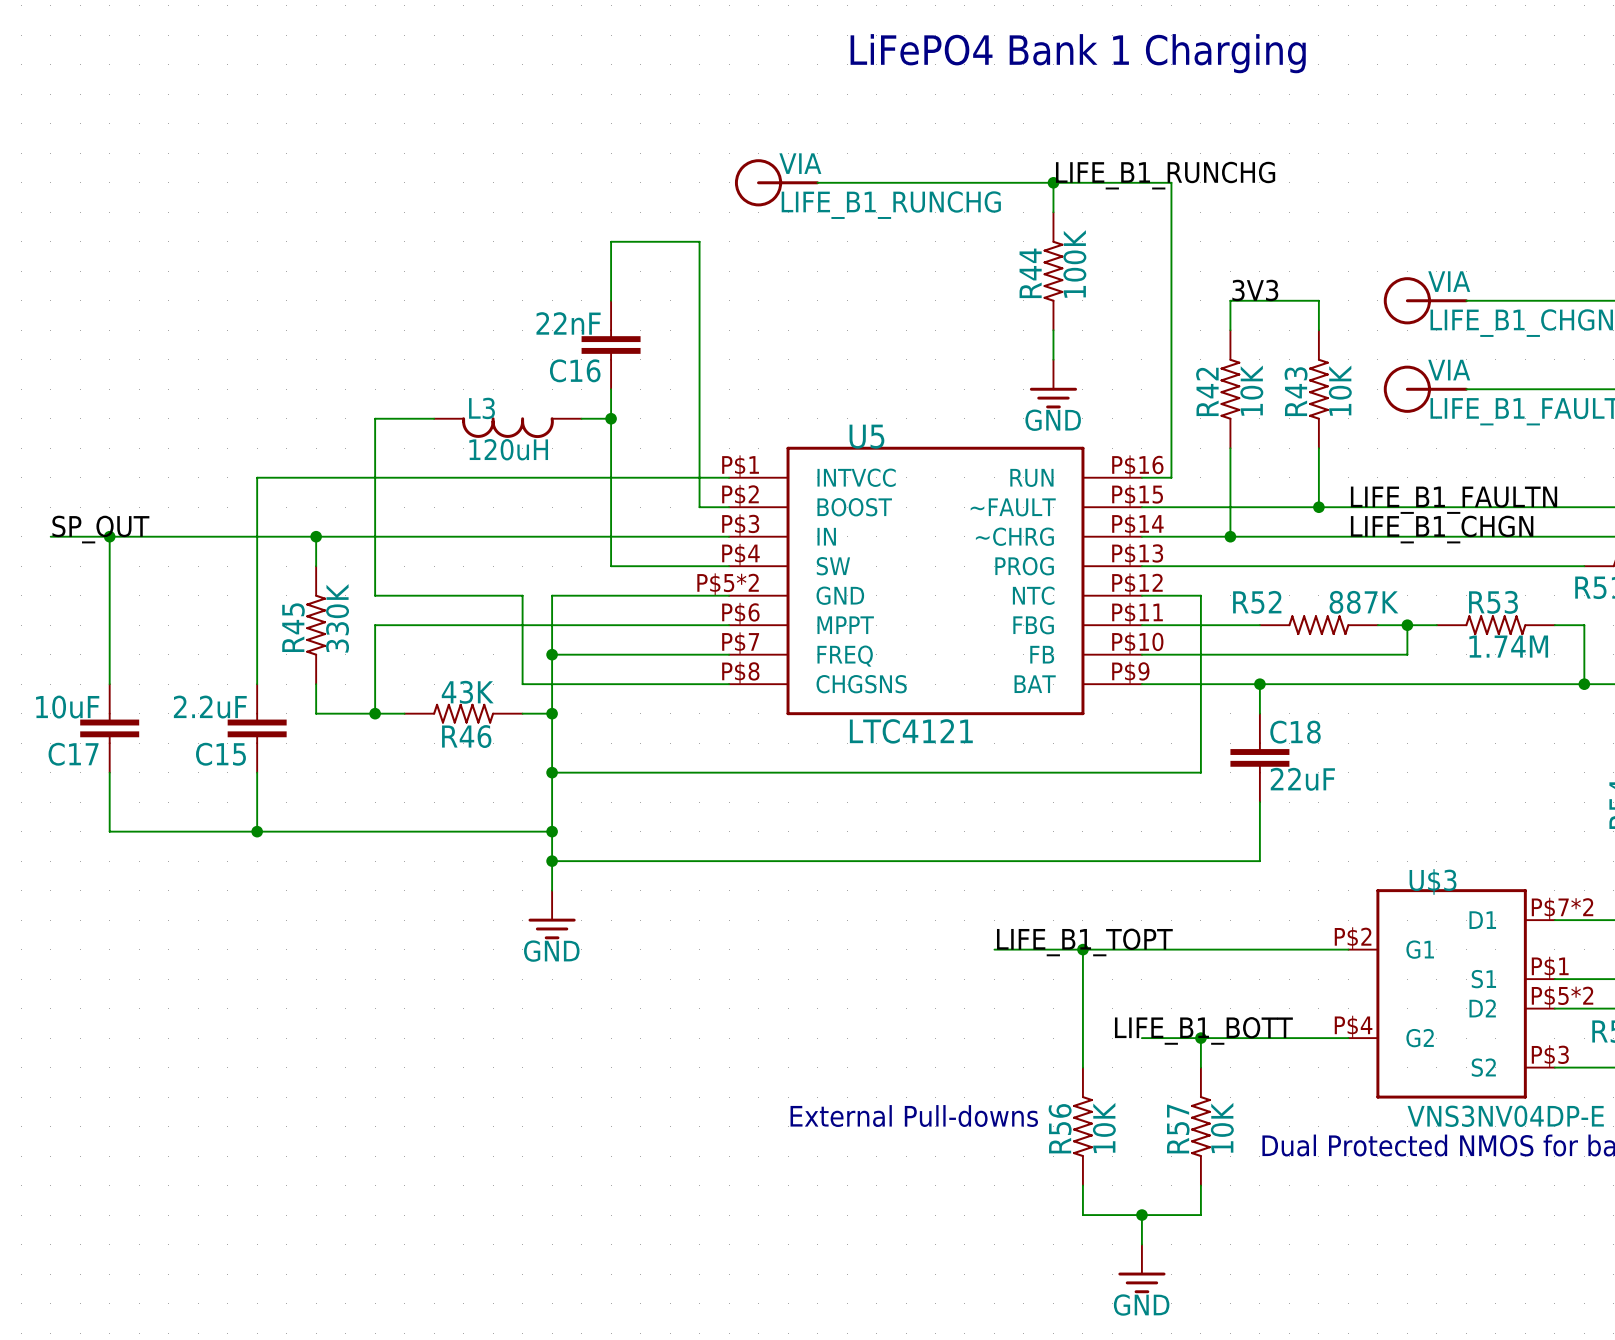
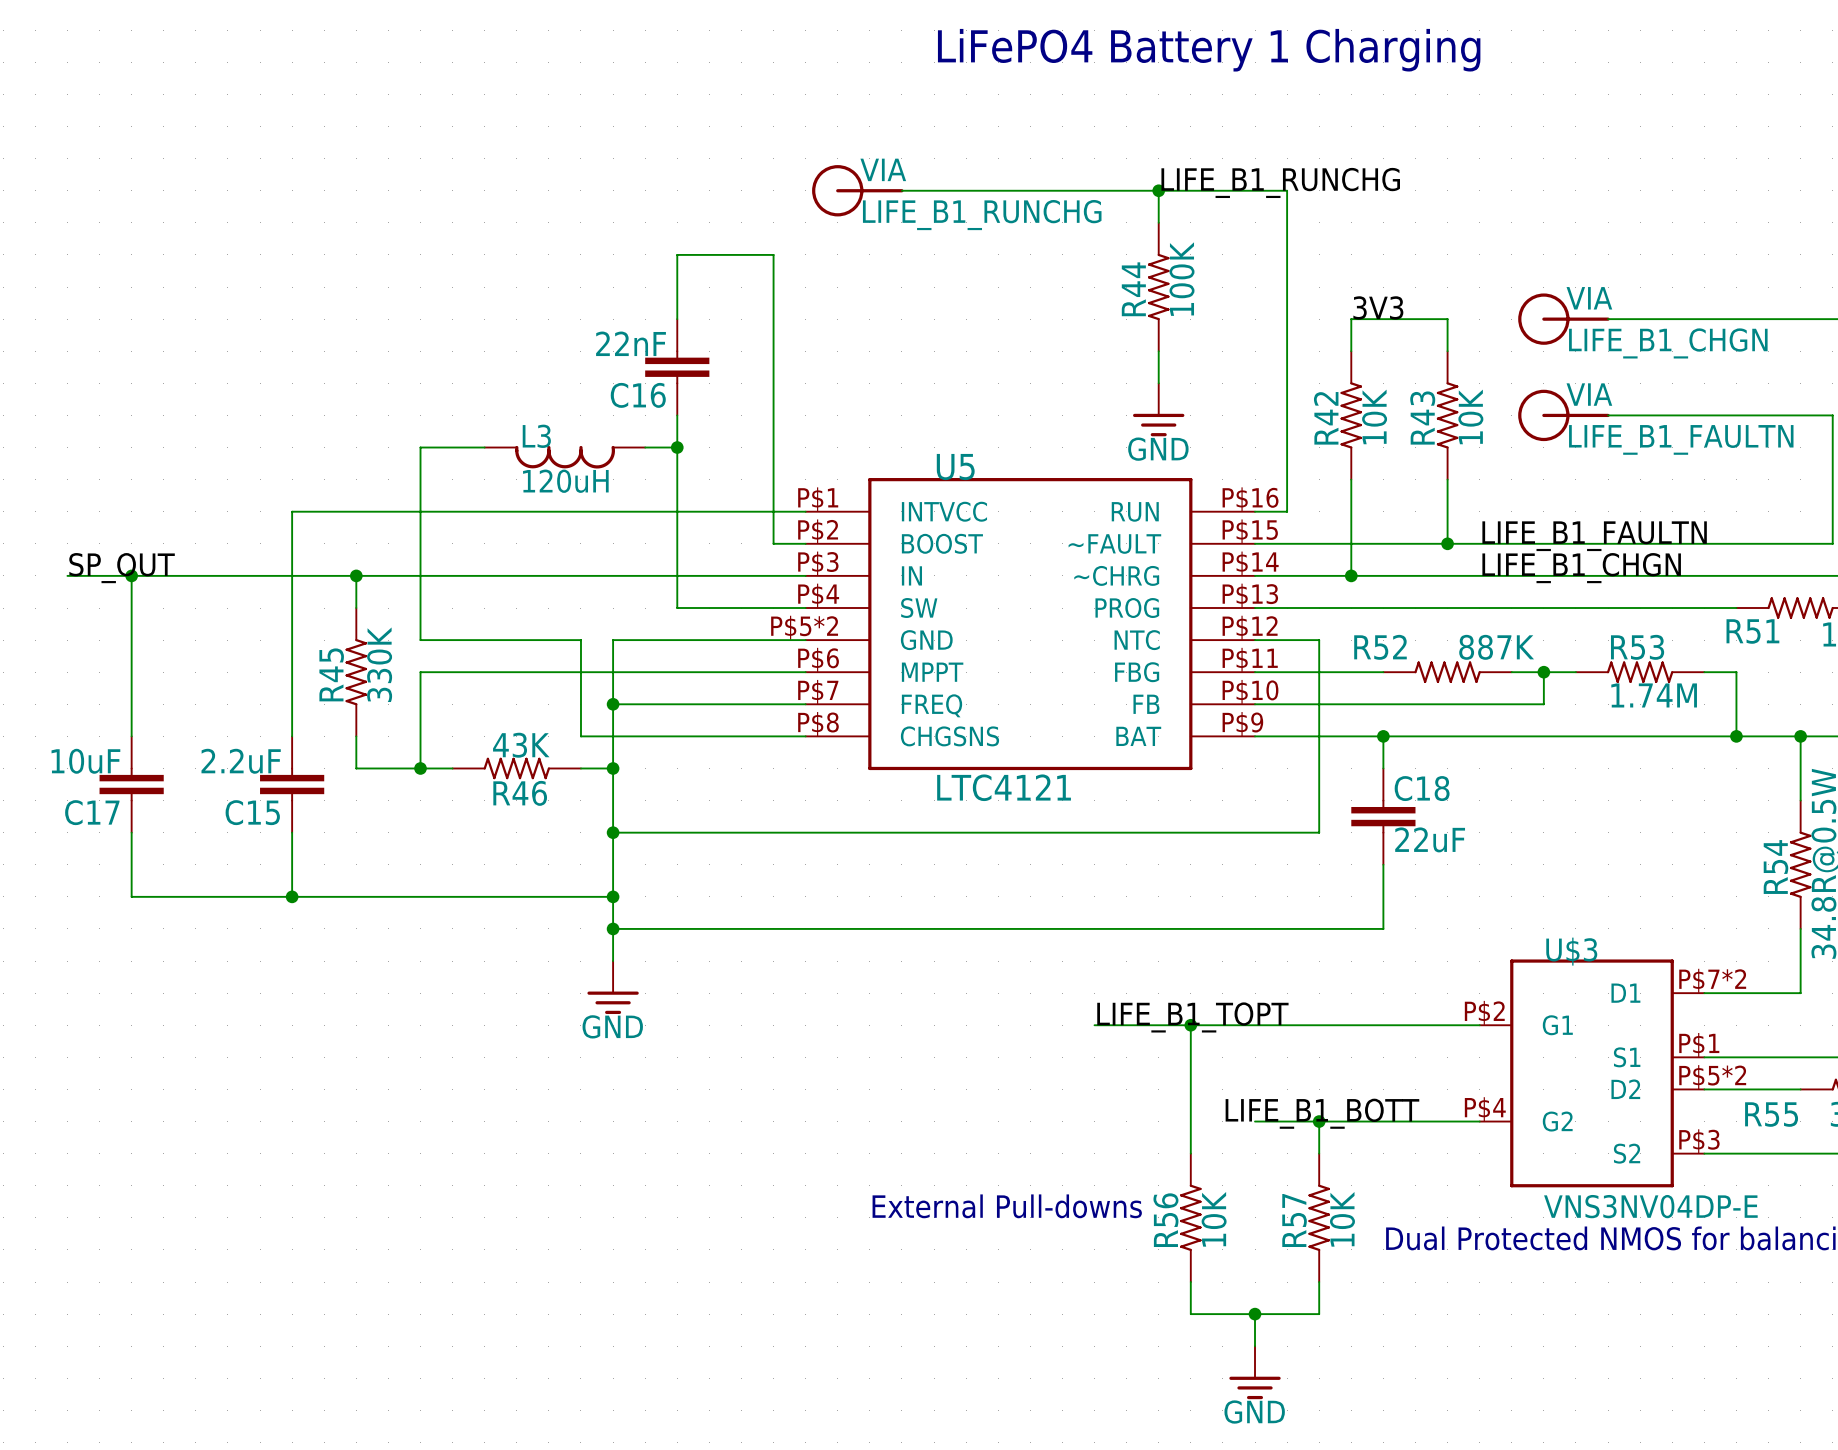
text: LiFePO4 Bank 1 Charging (1078, 53) -> LiFePO4 Battery 1 Charging (1209, 50)

